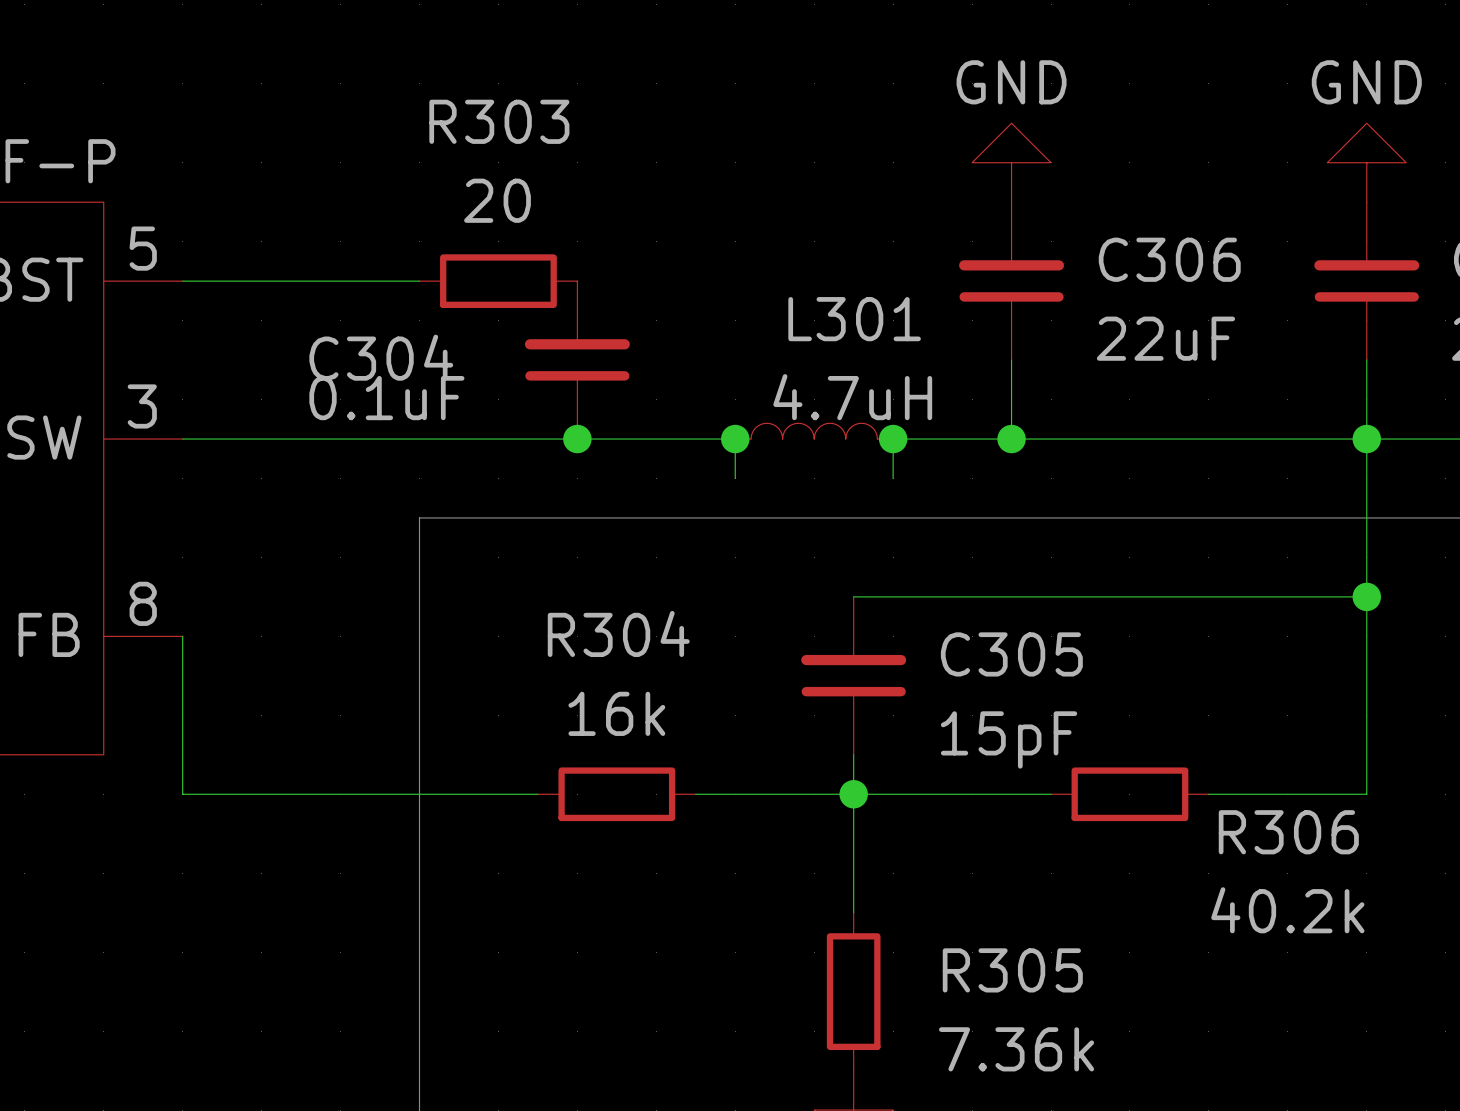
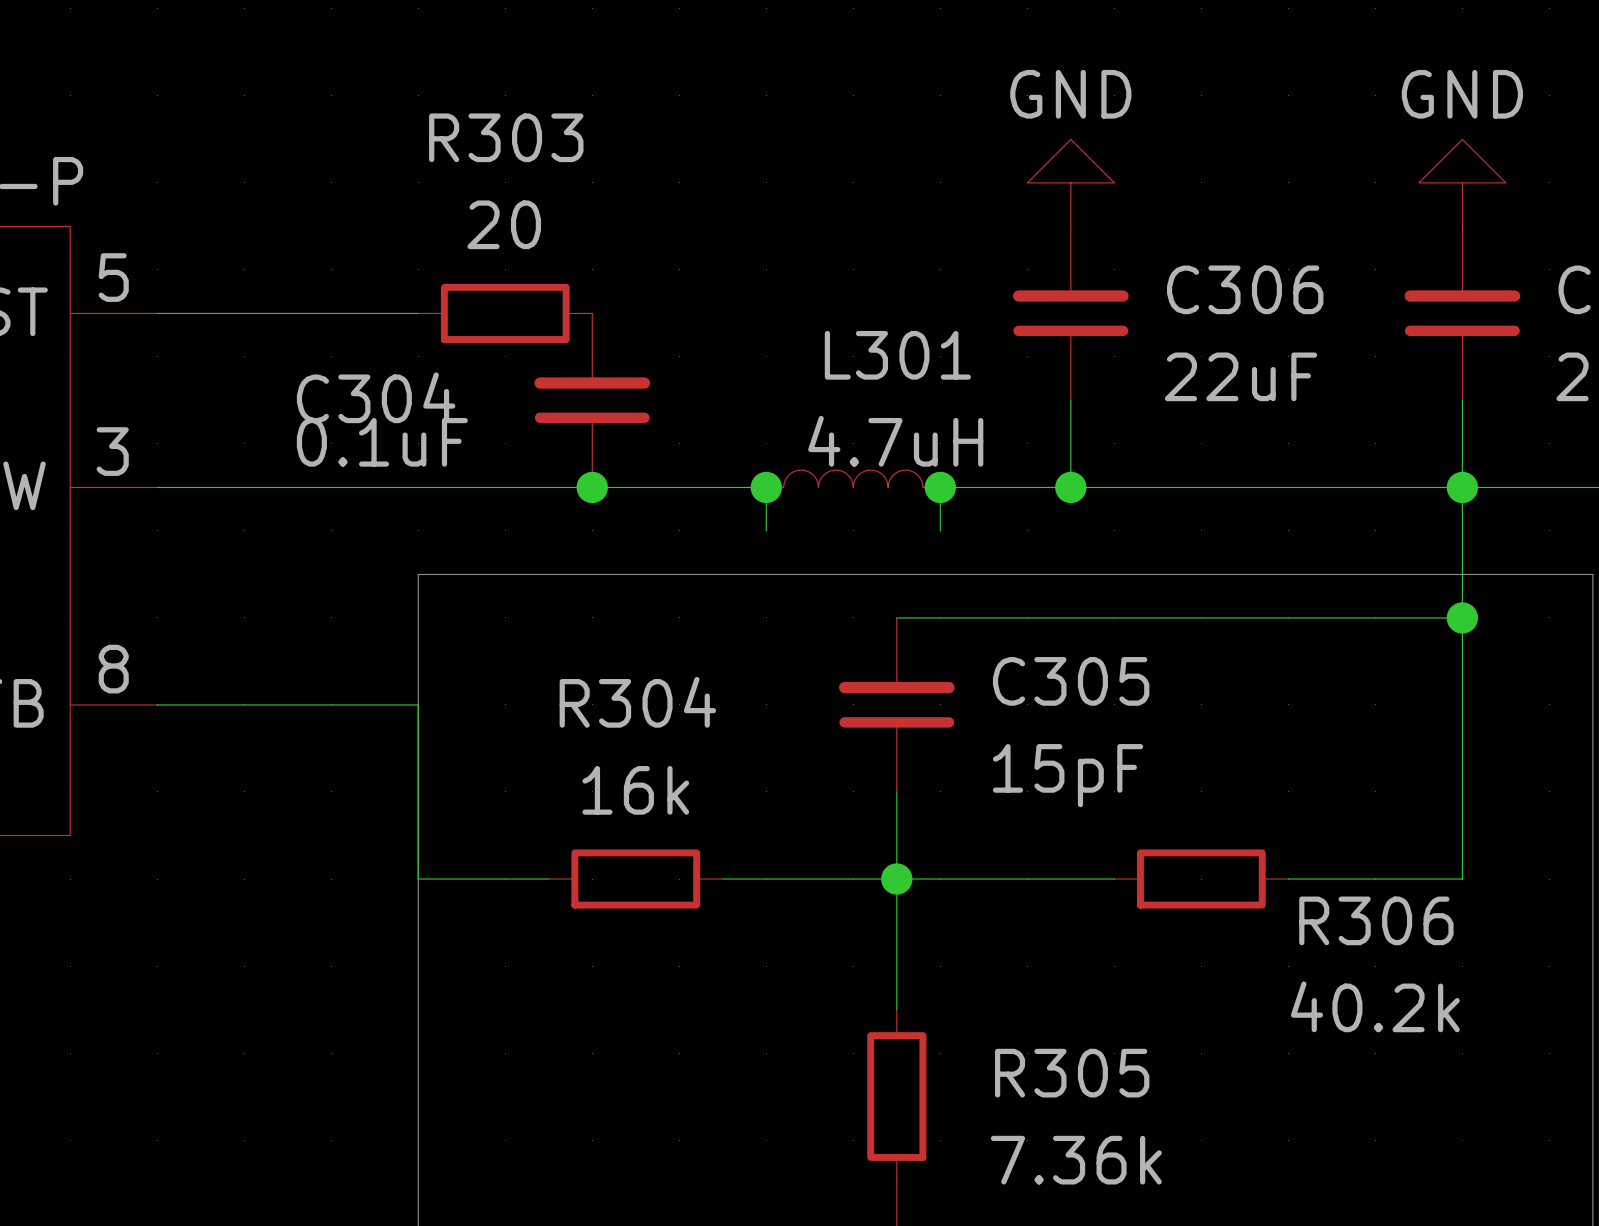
wire: (853, 596) (1366, 596) -> (896, 617) (1462, 617)
junction position: (1366, 596) -> (1462, 617)
wire: (182, 636) (182, 794) (419, 794) -> (157, 704) (418, 704) (418, 879)
C305 position: (853, 675) -> (896, 704)

